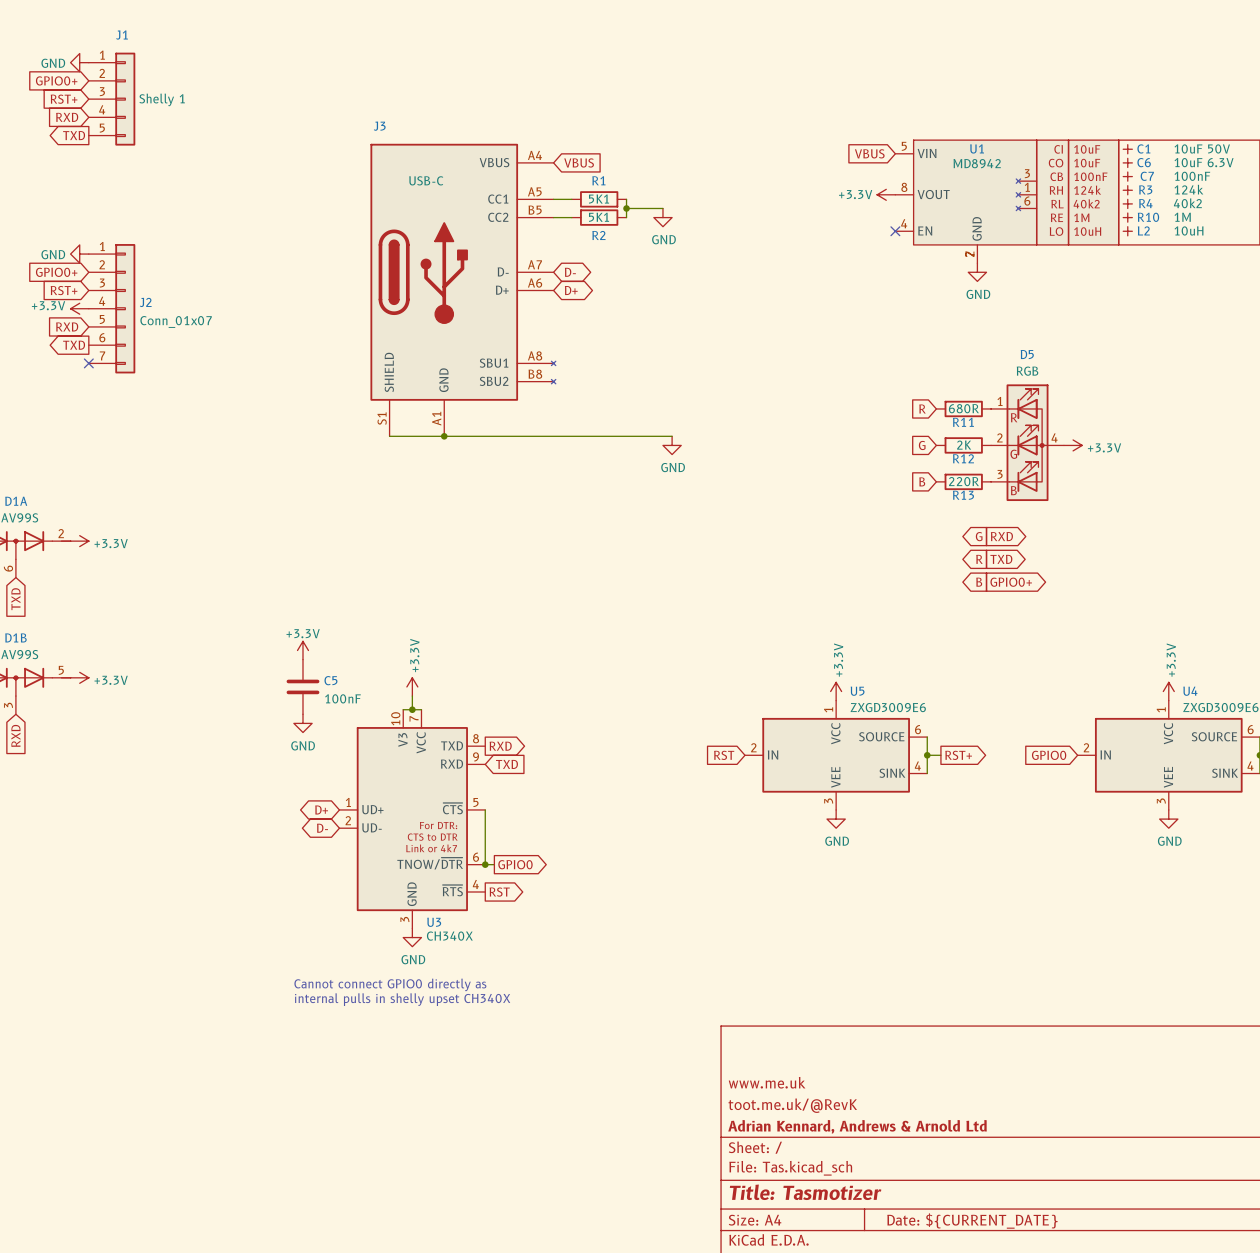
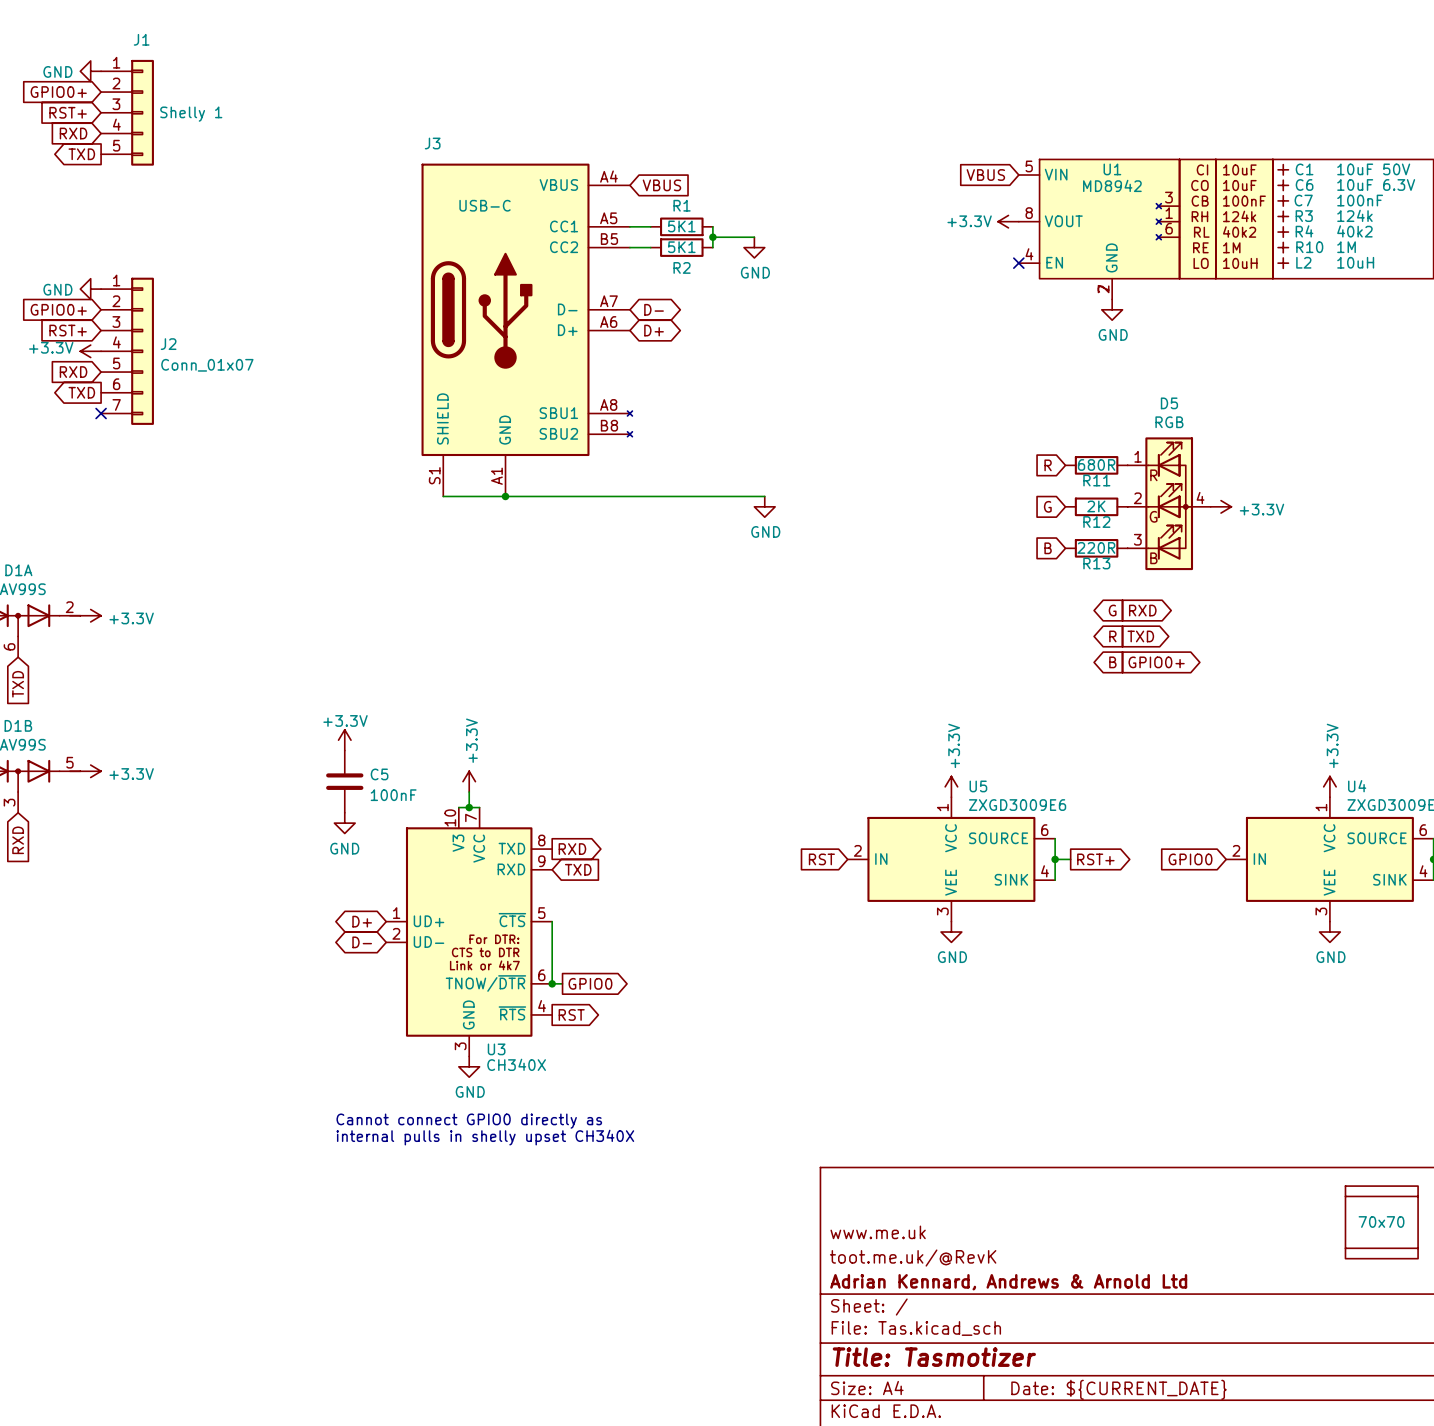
part: none -> (1381, 1196)
part: none -> 70x70 (1381, 1222)
part: none -> (1381, 1248)

